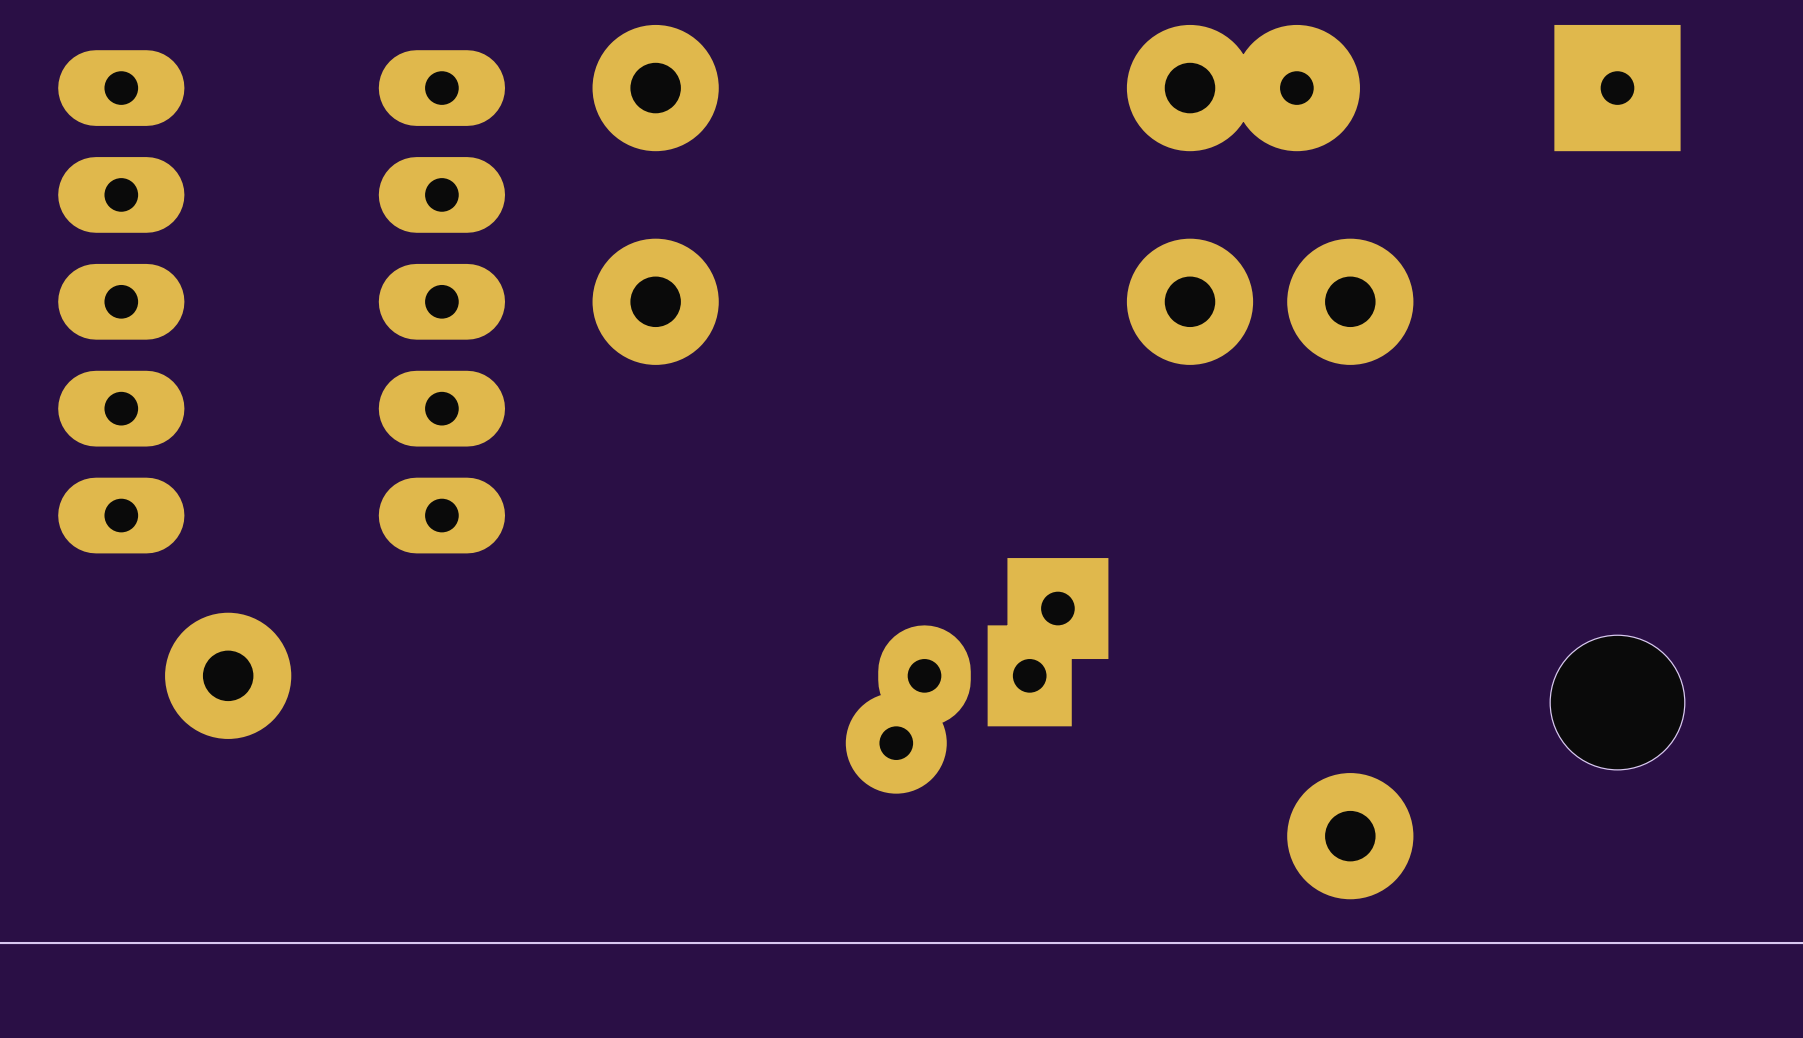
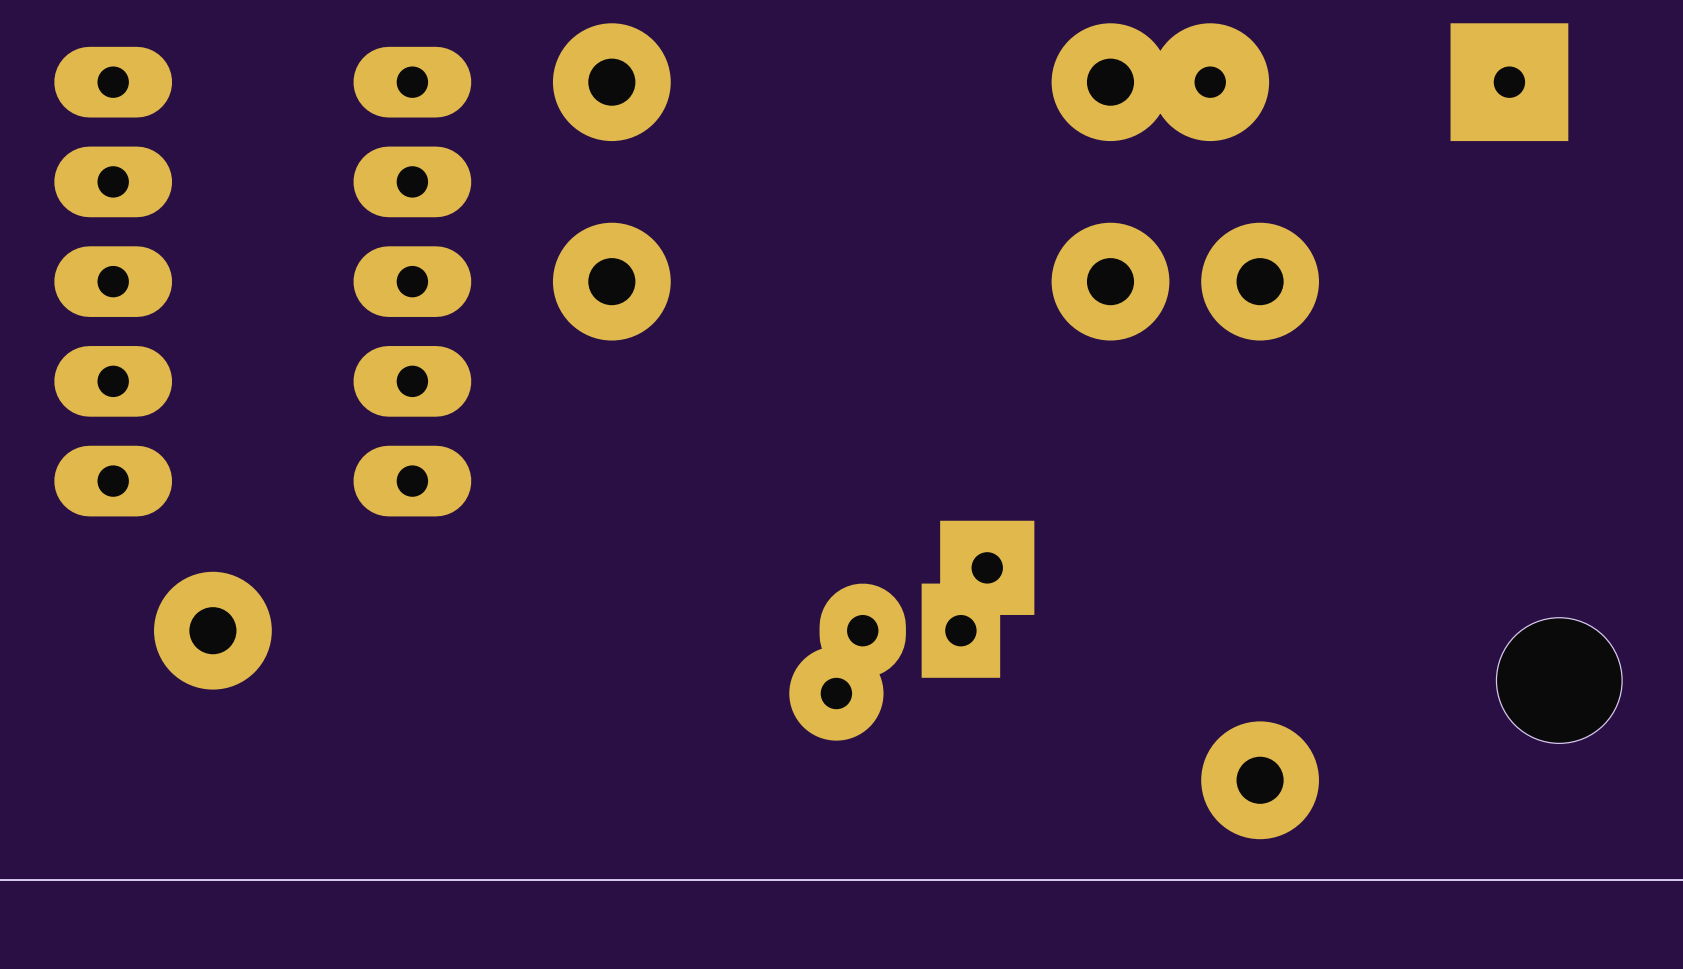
part position: (1617, 702) -> (1559, 680)

